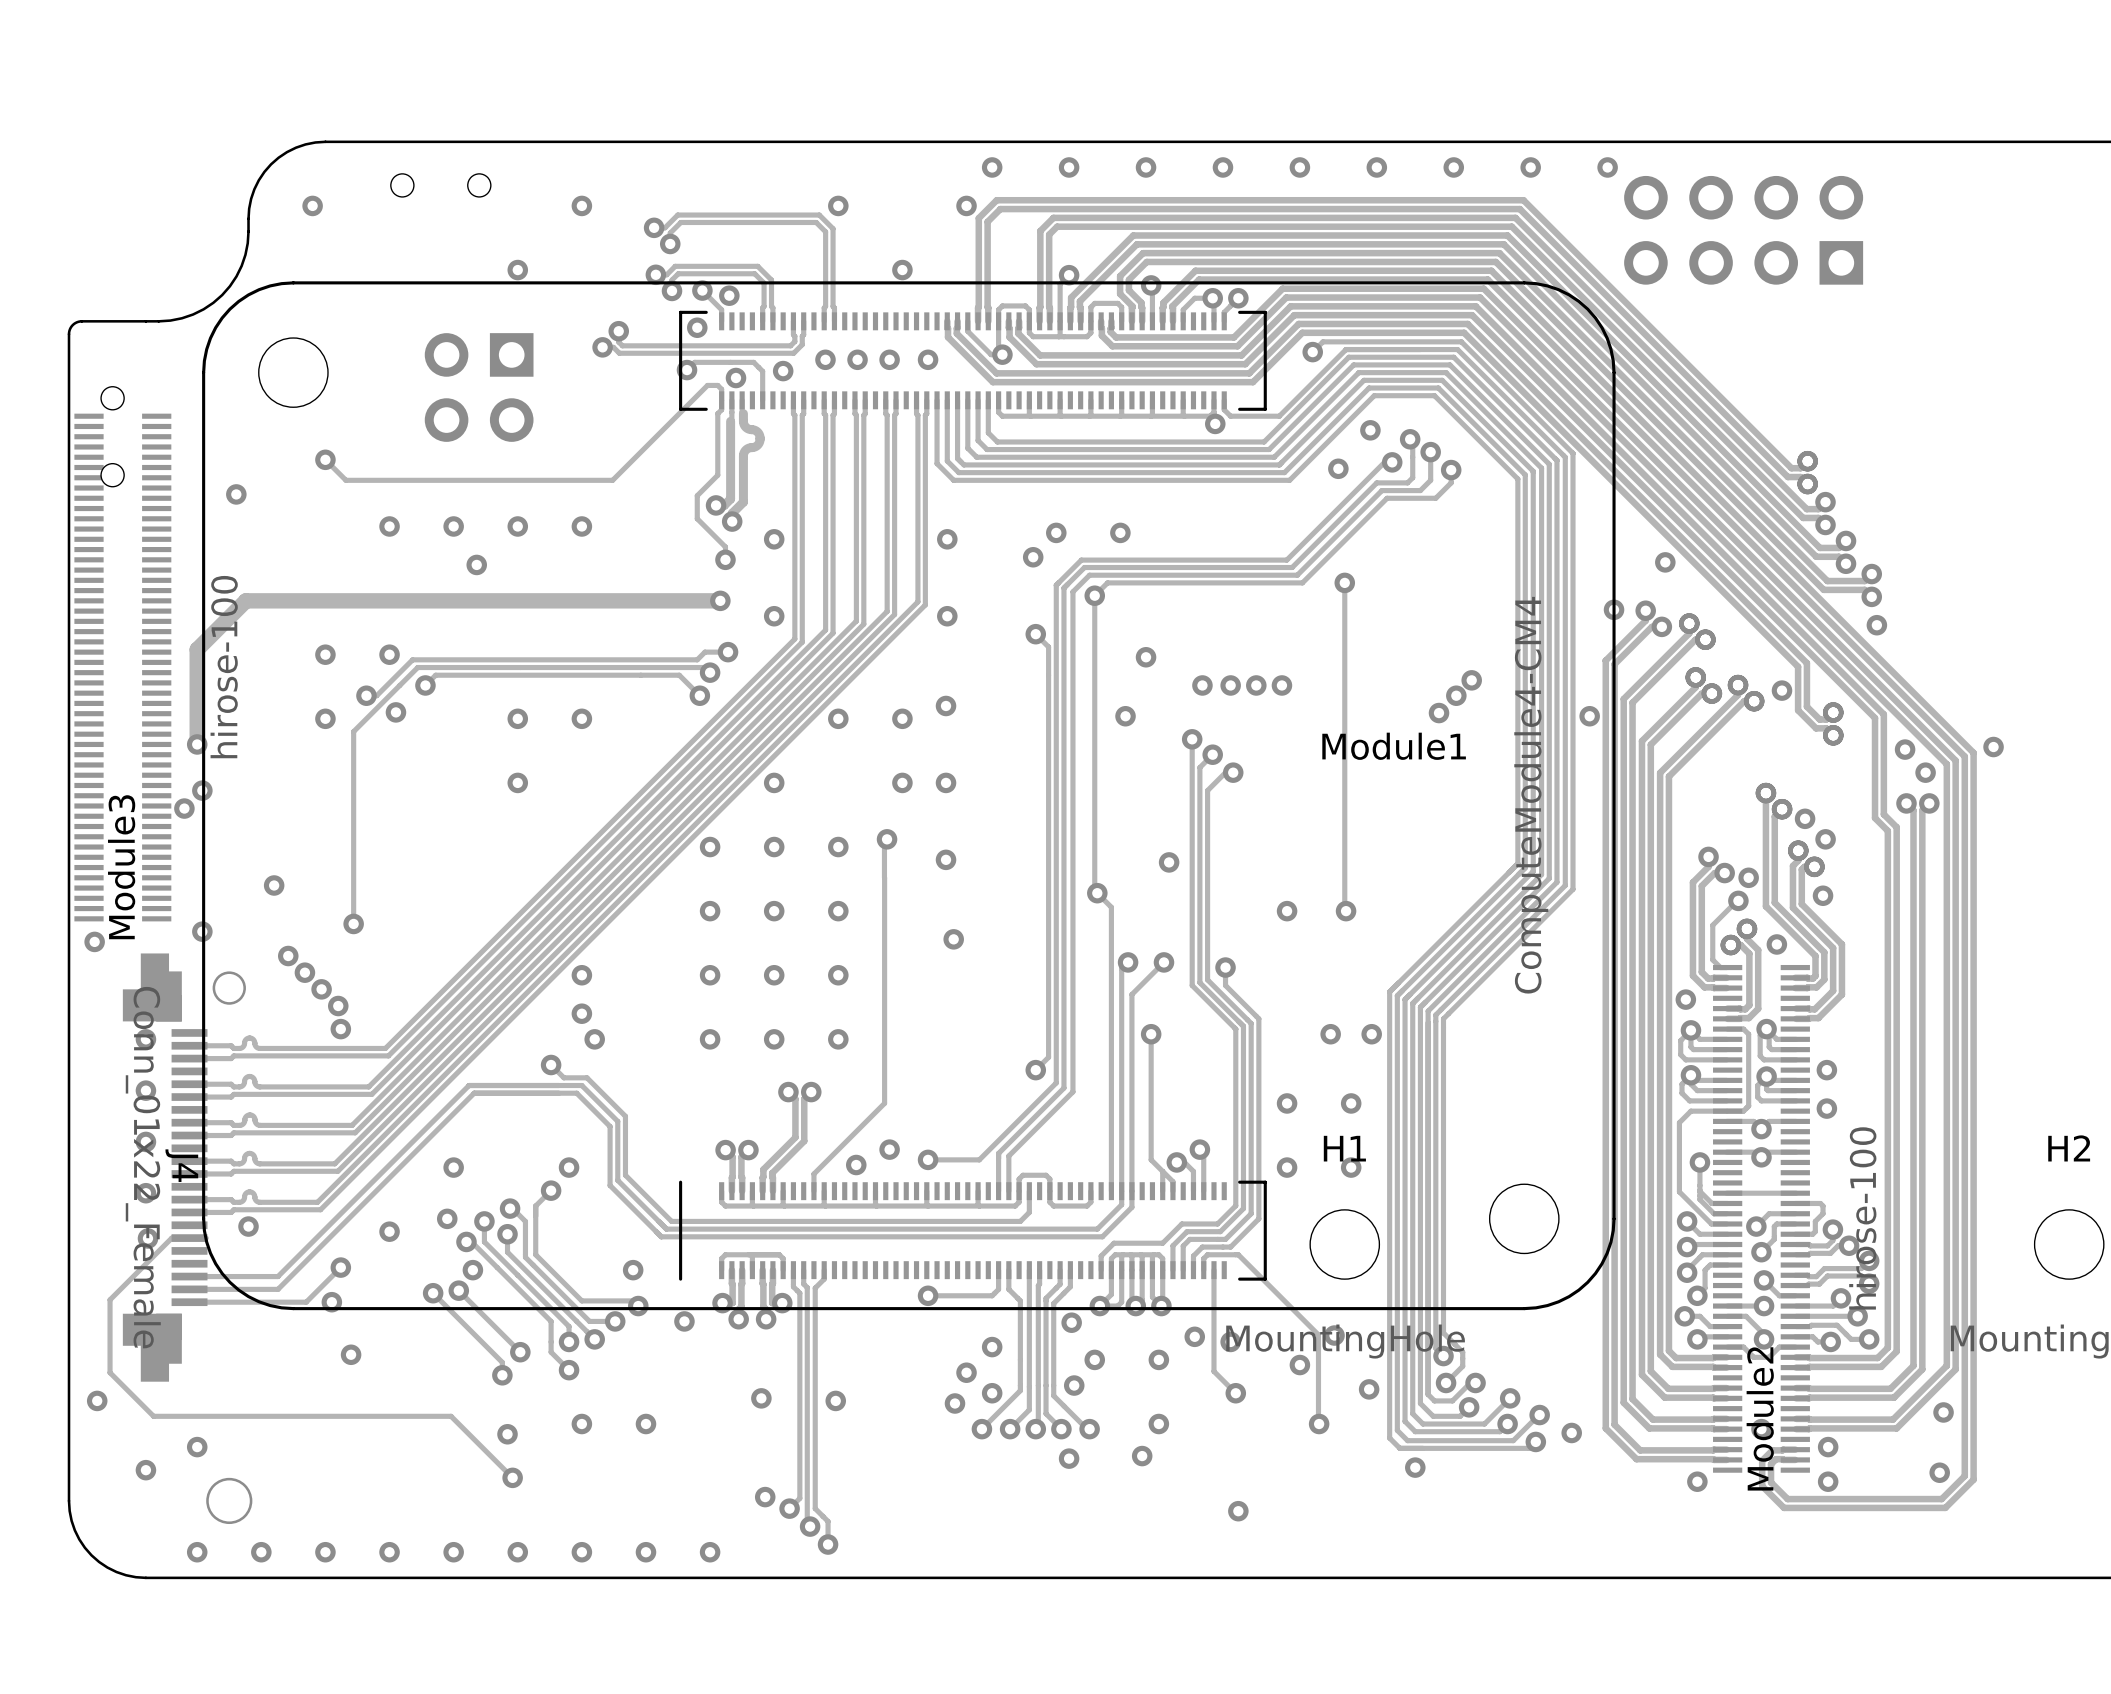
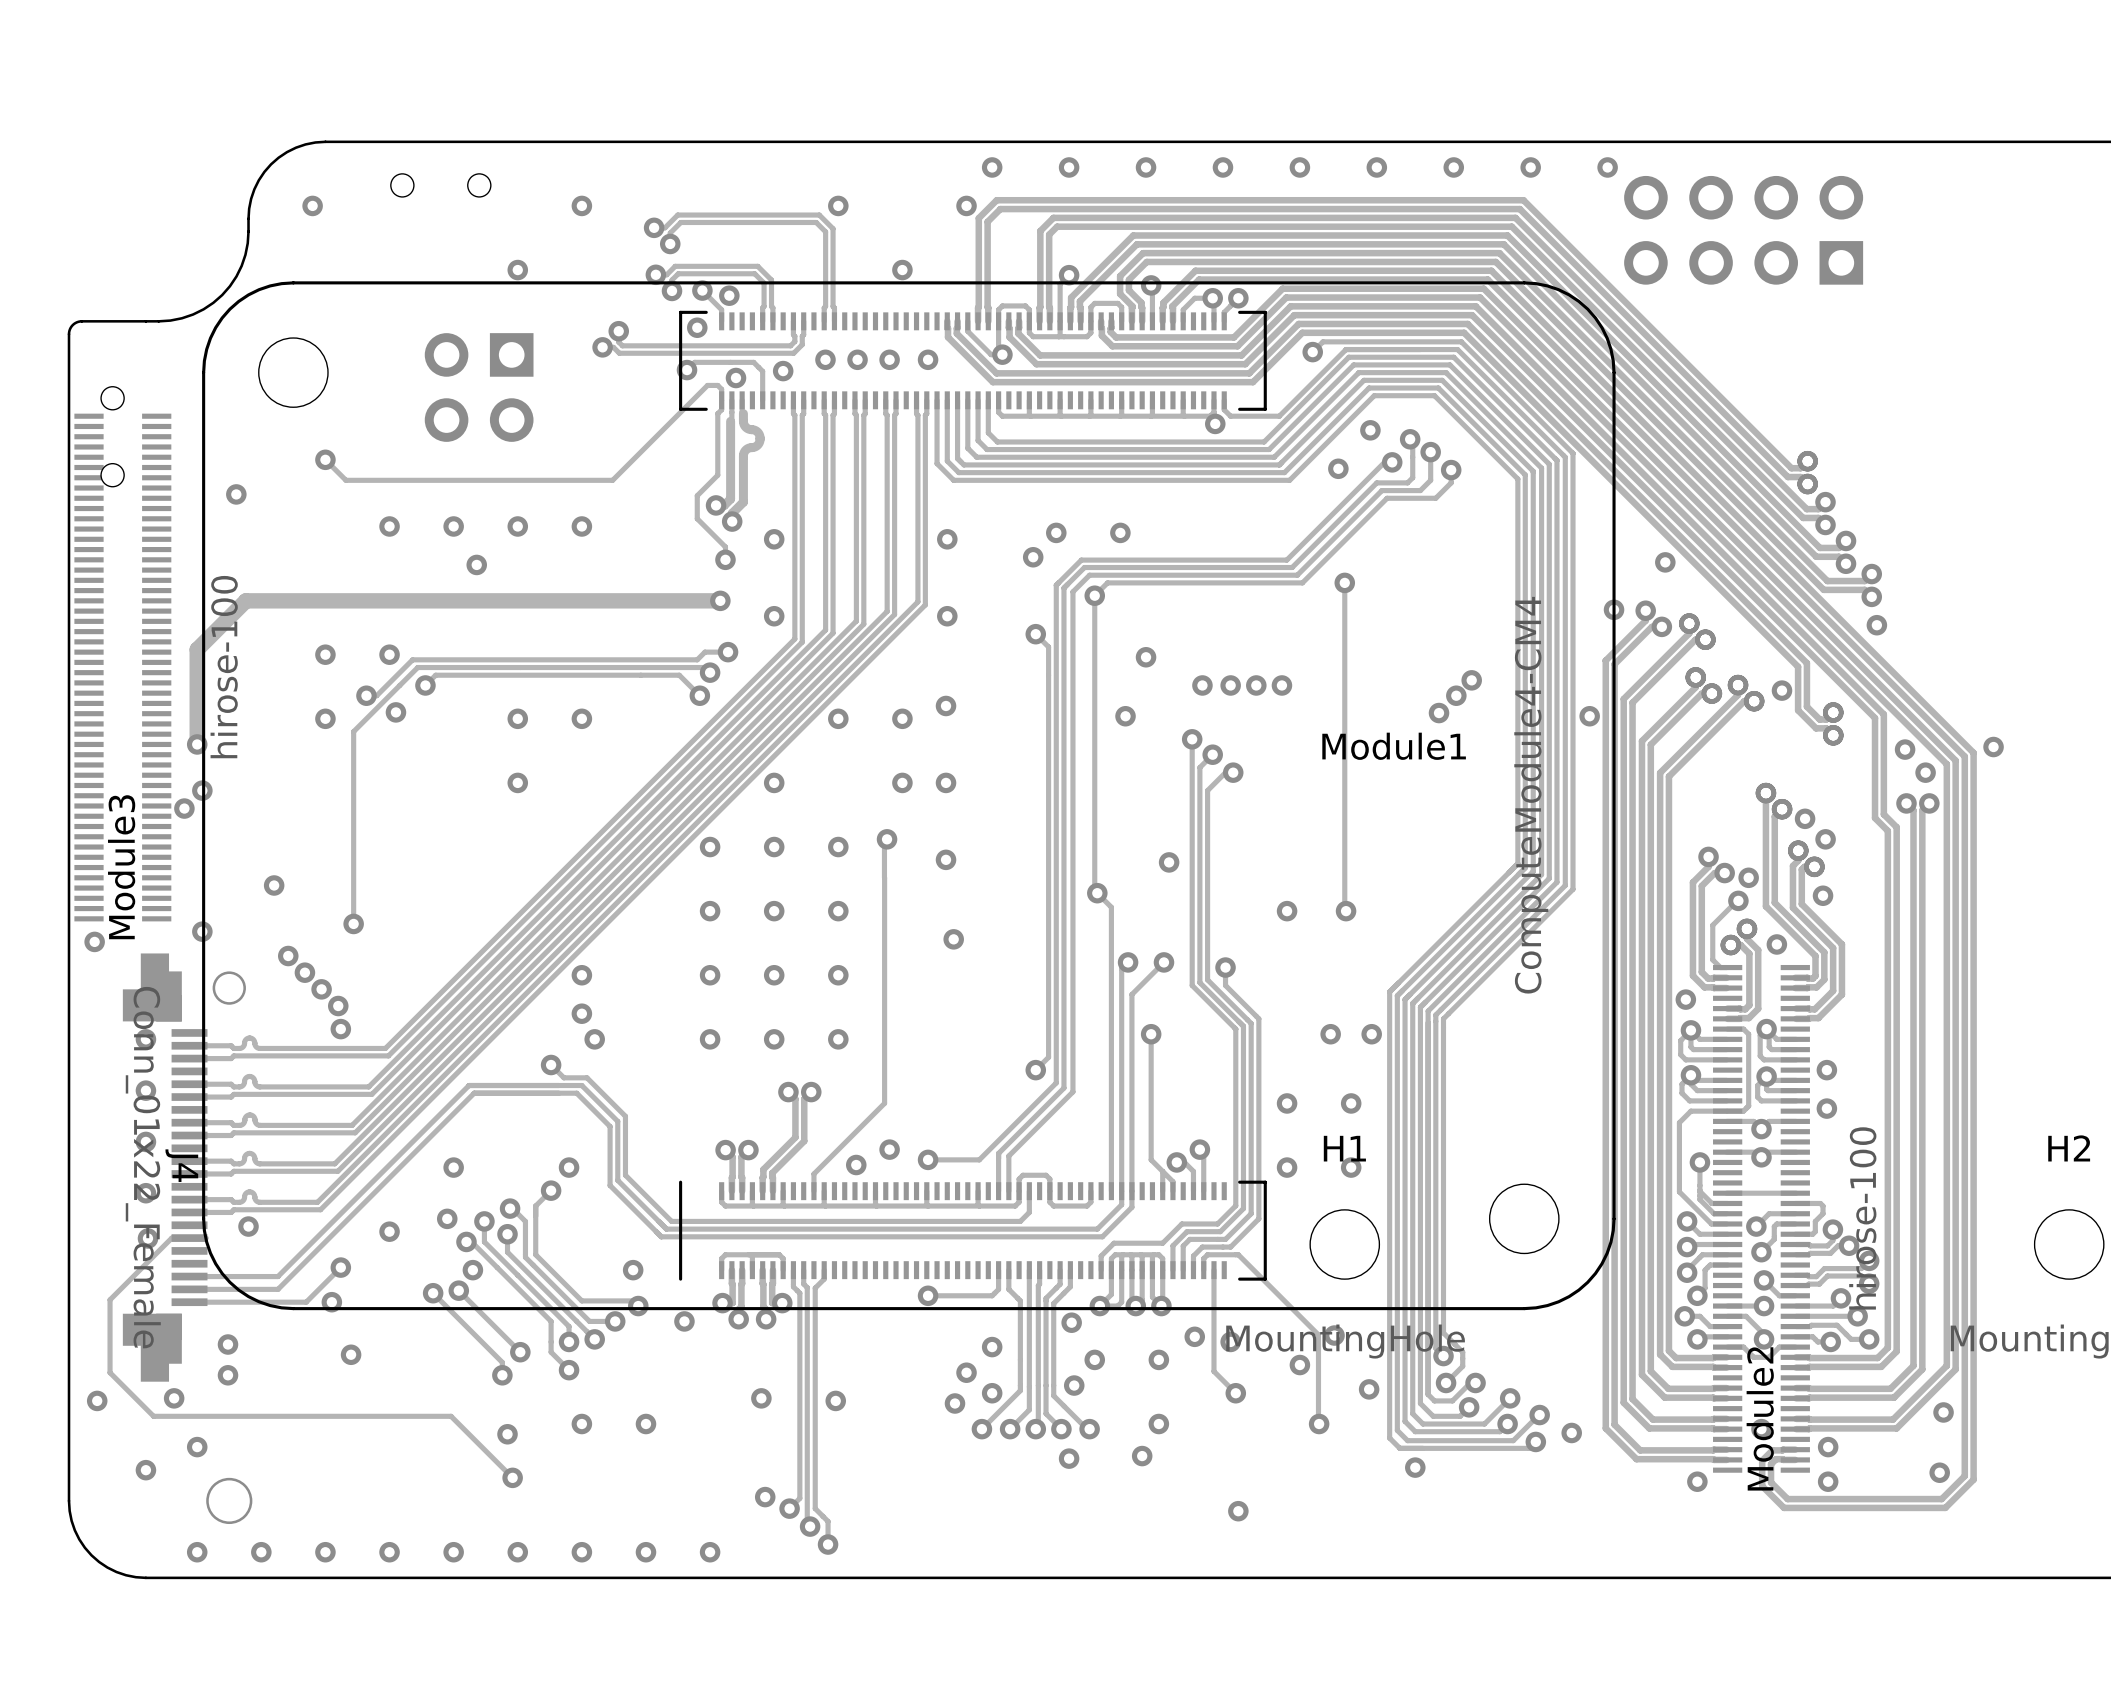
via: none -> (227, 1344)
via: none -> (227, 1375)
via: none -> (174, 1398)

